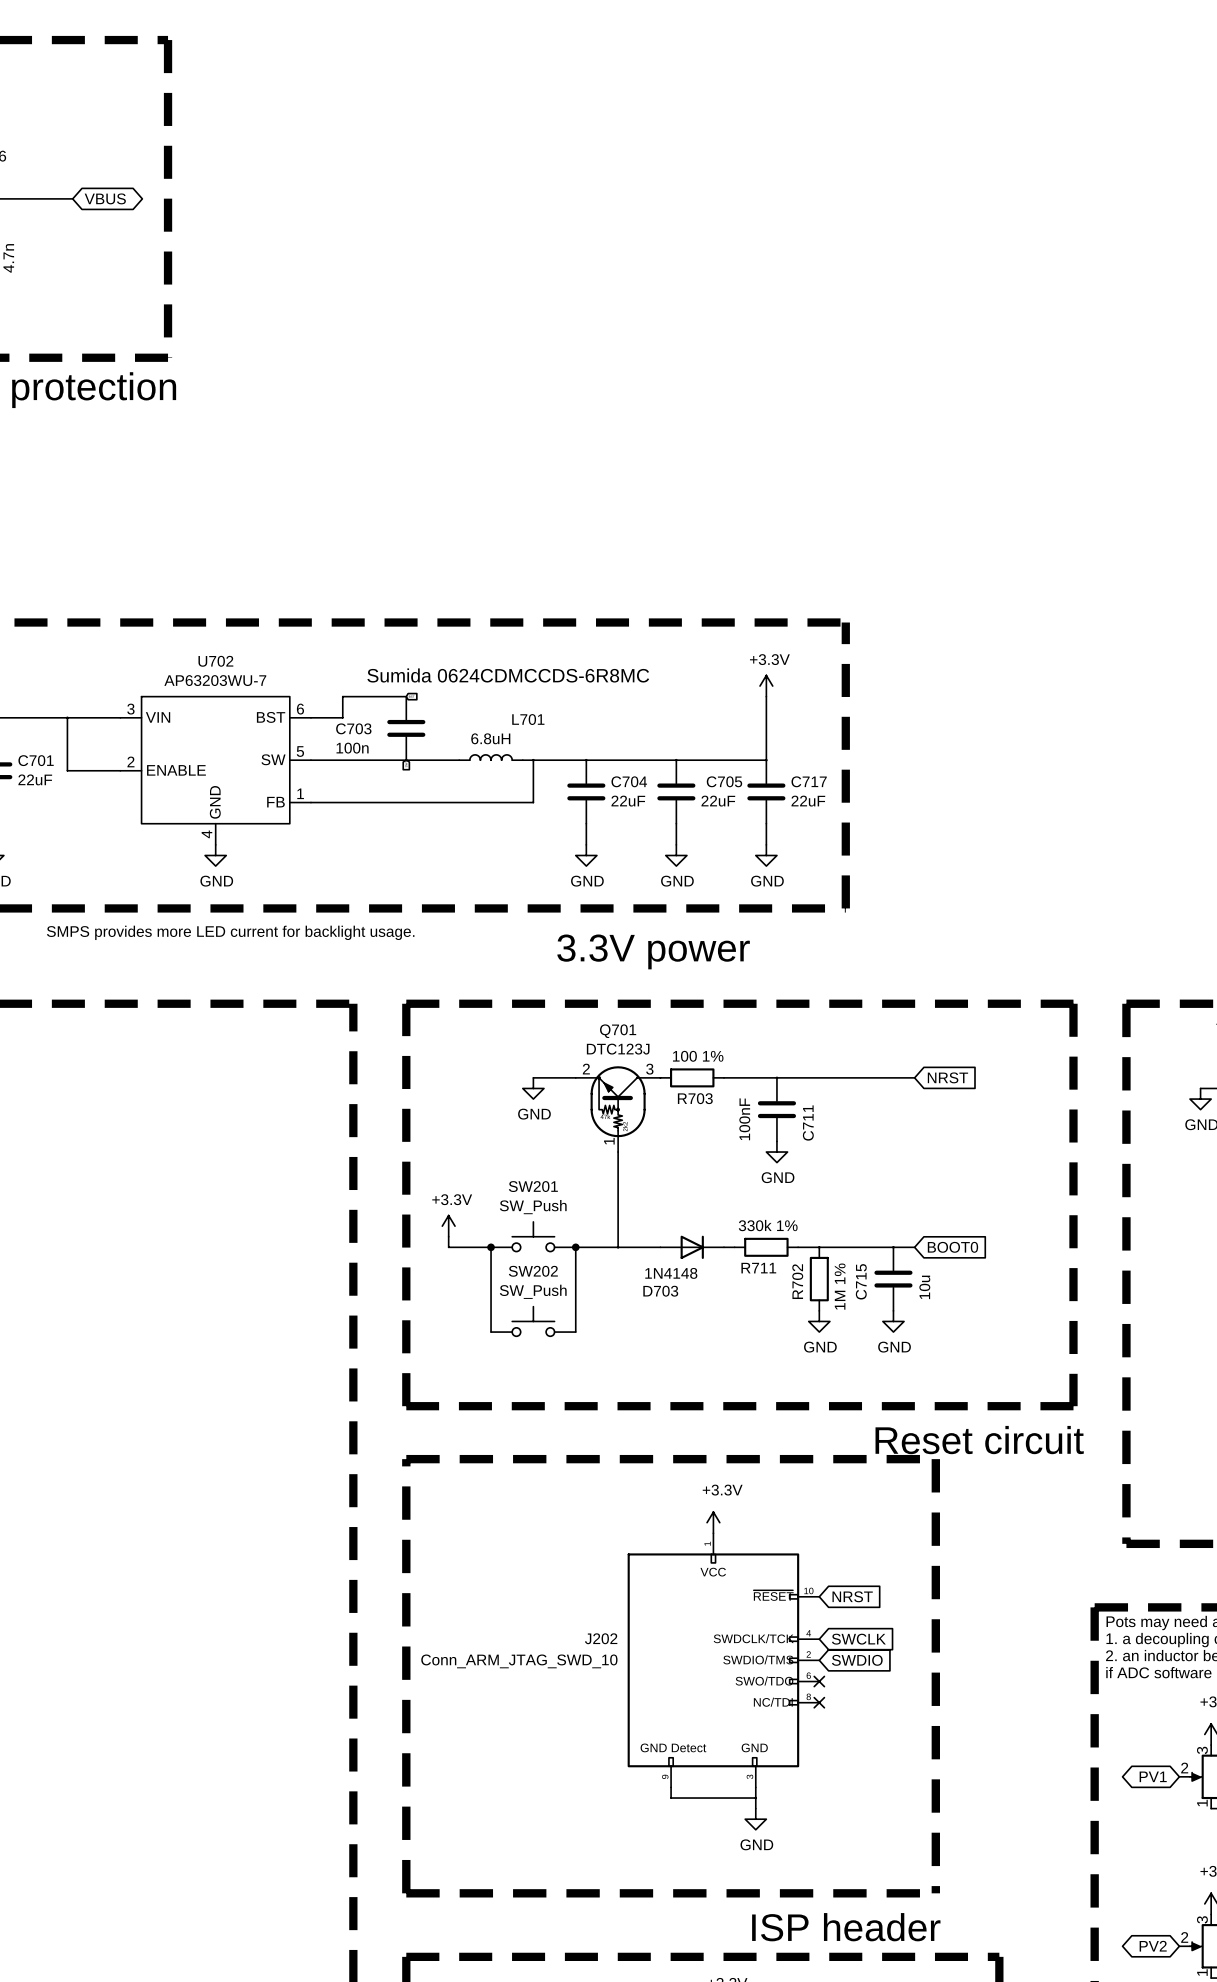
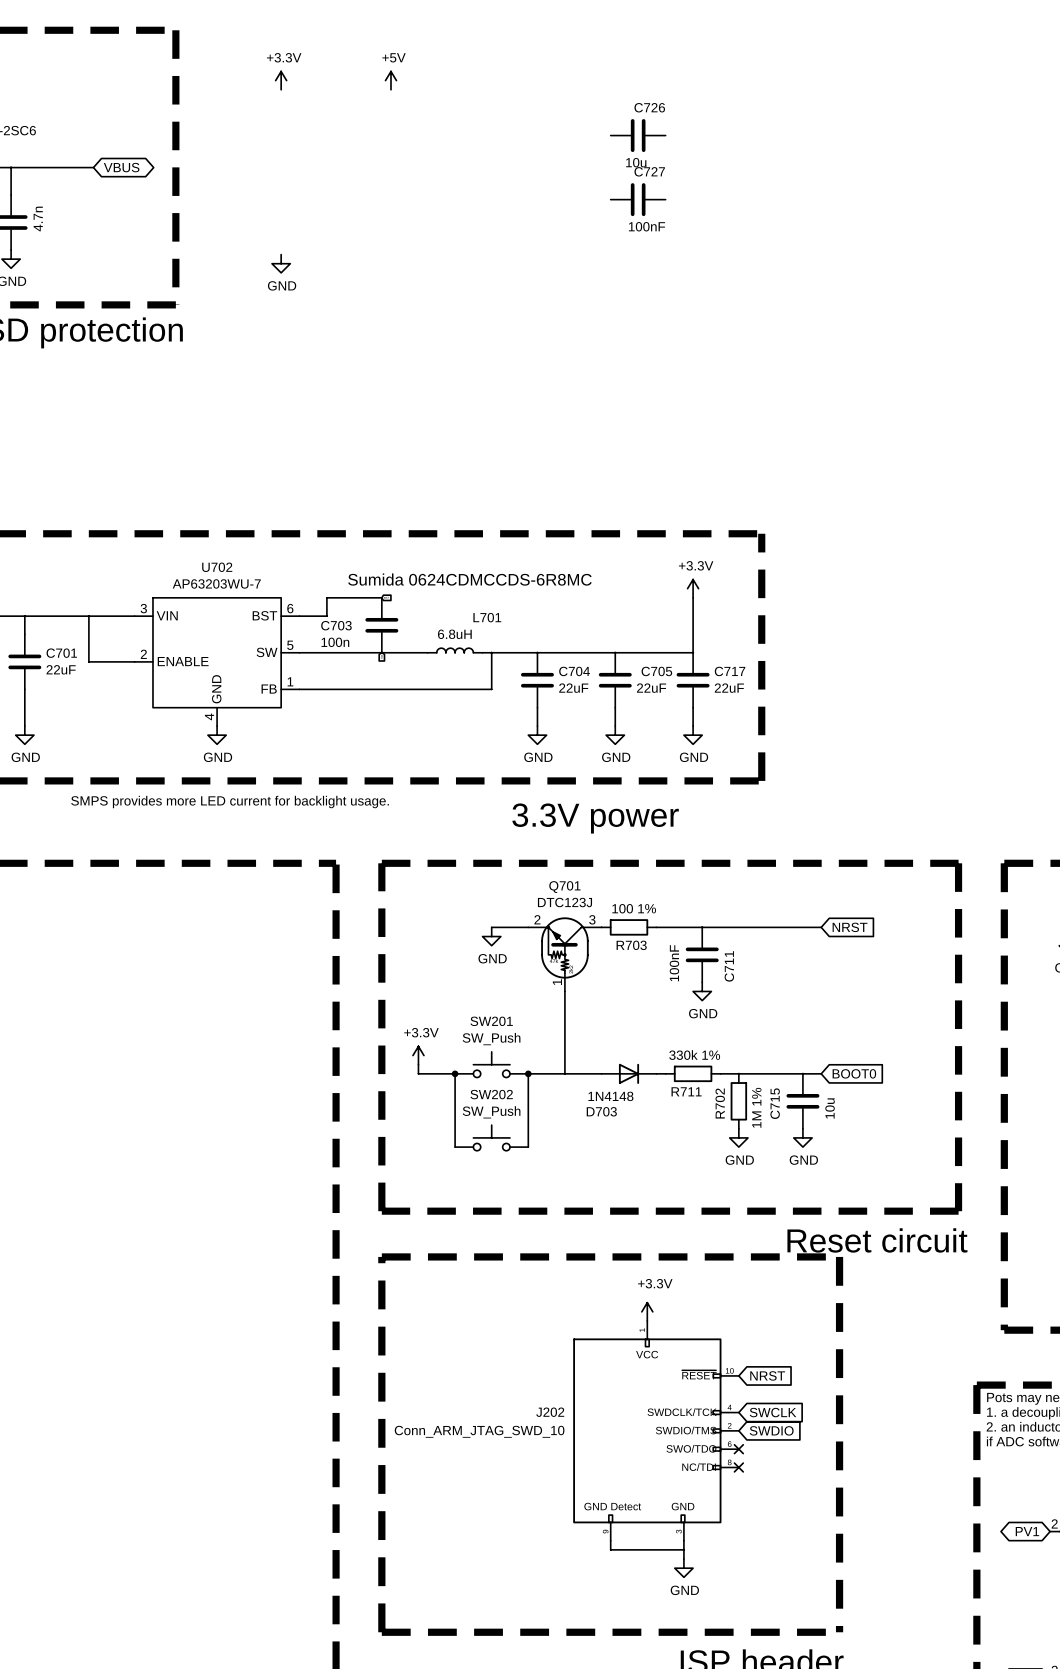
power symbol: none -> +3.3V (281, 80)
power symbol: none -> +5V (390, 80)
C726: none -> 10u (638, 135)
C727: none -> 100nF (638, 199)
power symbol: none -> GND (281, 263)

